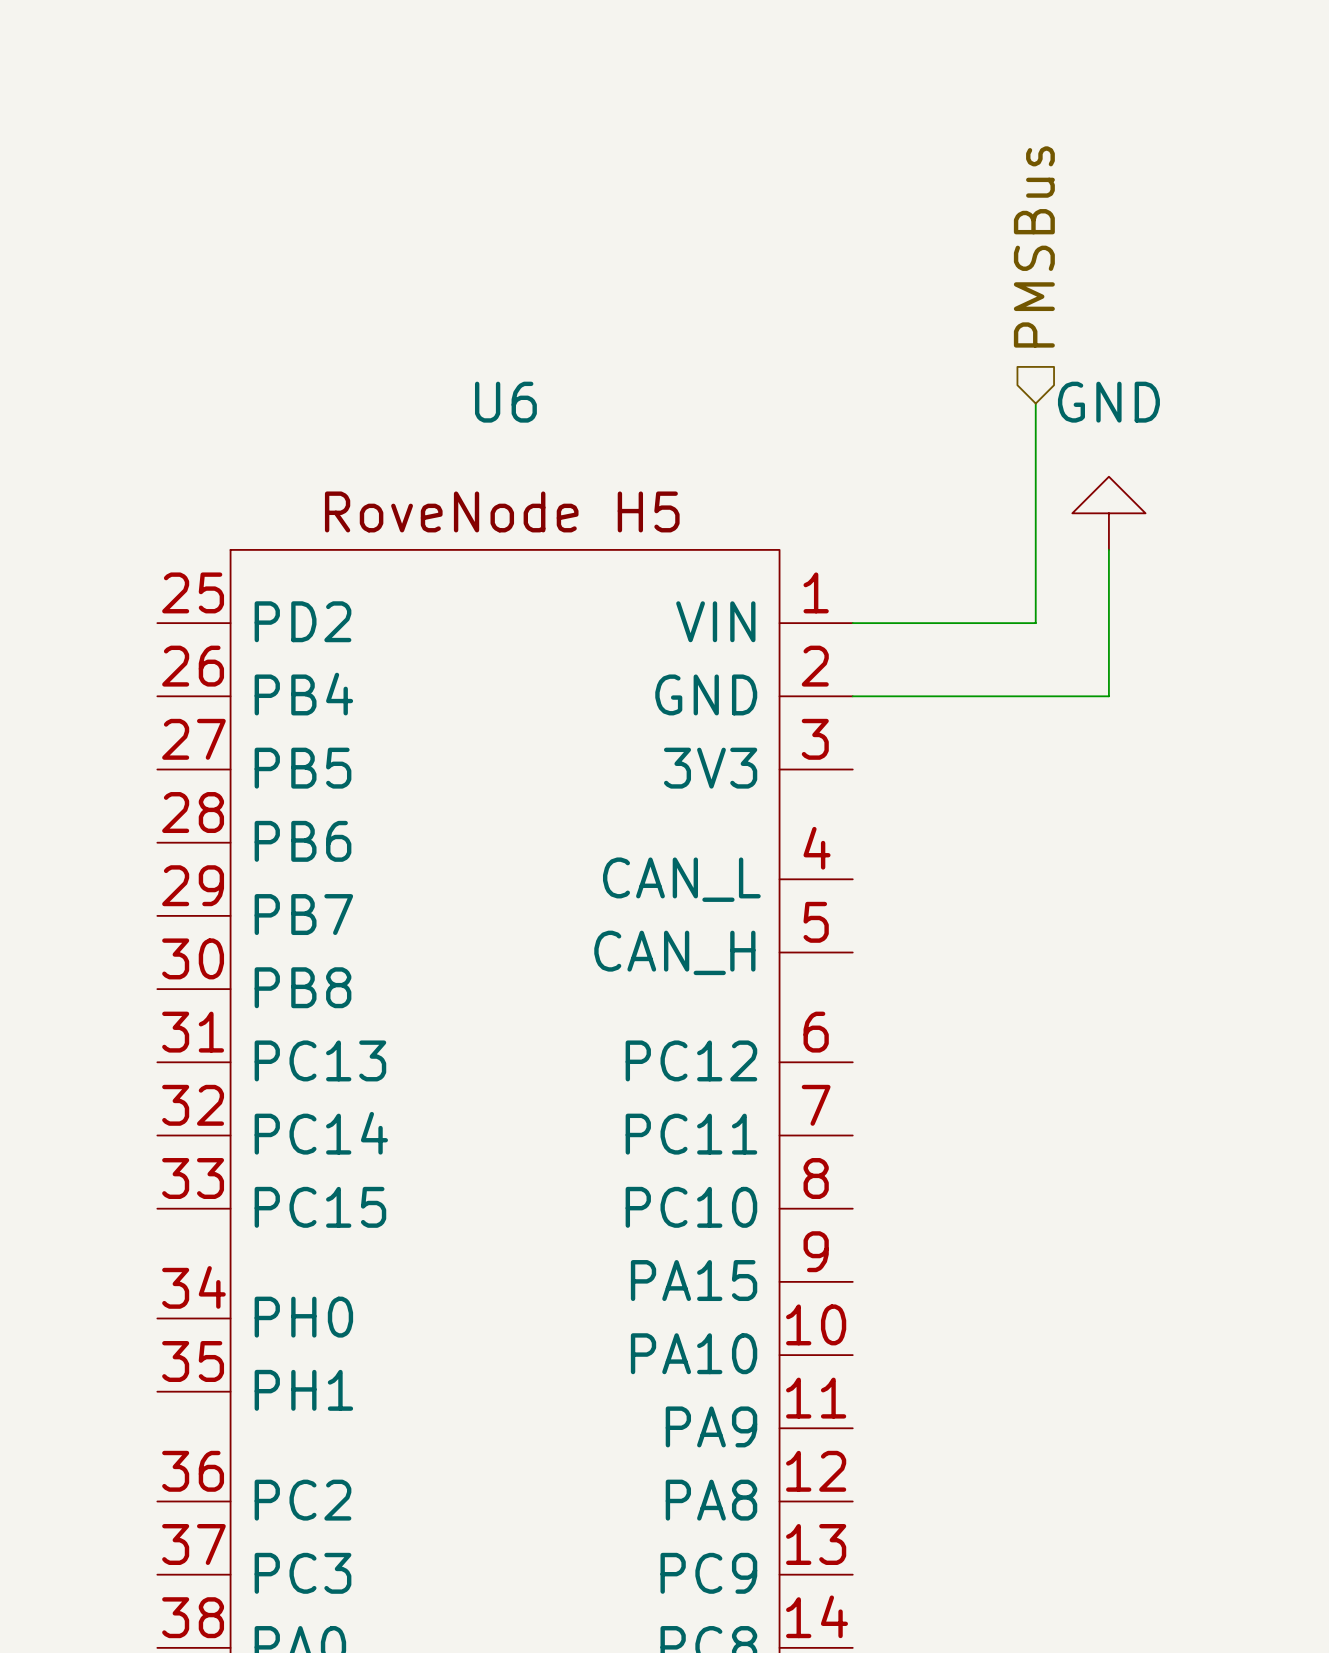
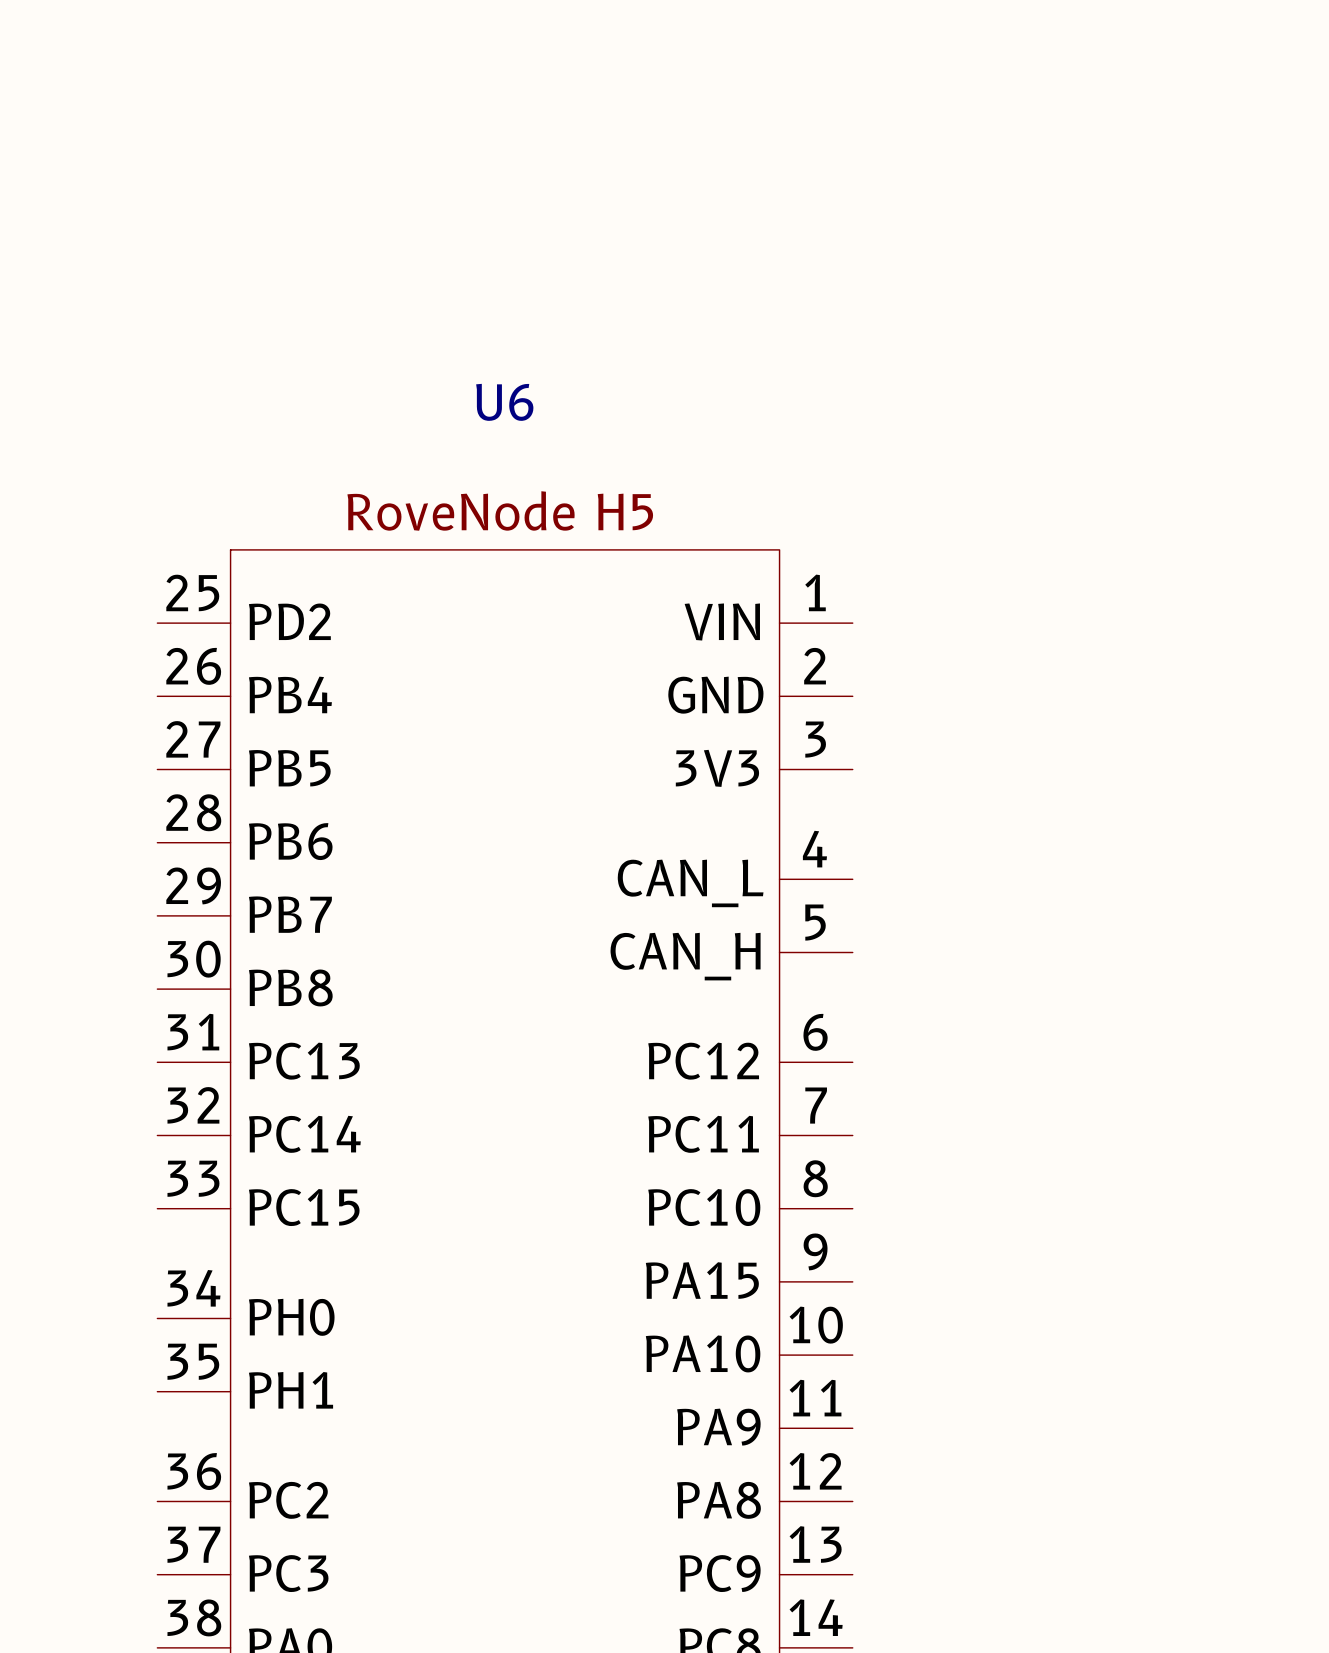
hierarchical label: PMSBus (1034, 246) -> none
wire: (1035, 403) (1035, 623) (852, 623) -> none
power symbol: GND (1108, 513) -> none
wire: (1108, 549) (1108, 696) (852, 696) -> none

